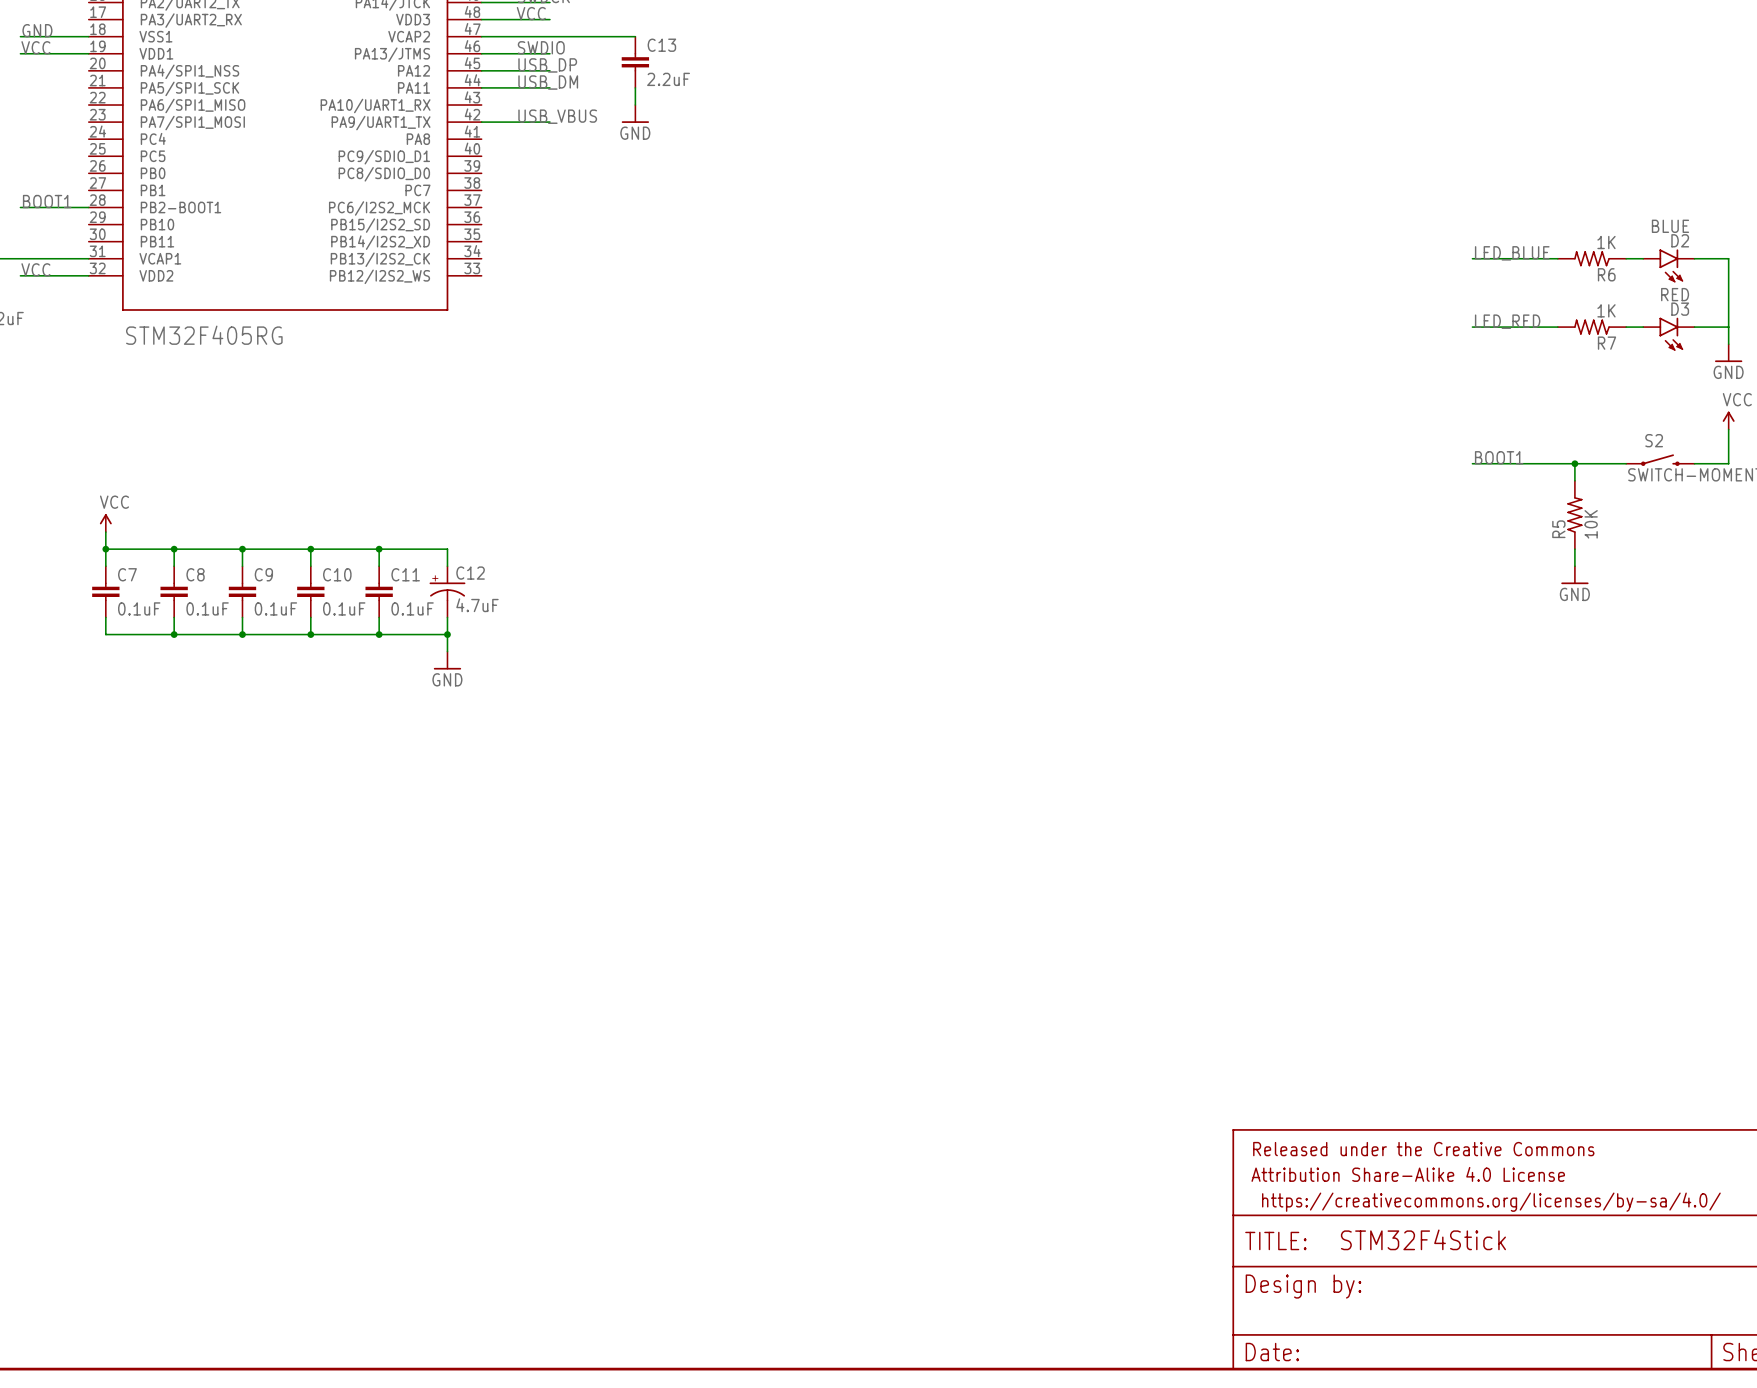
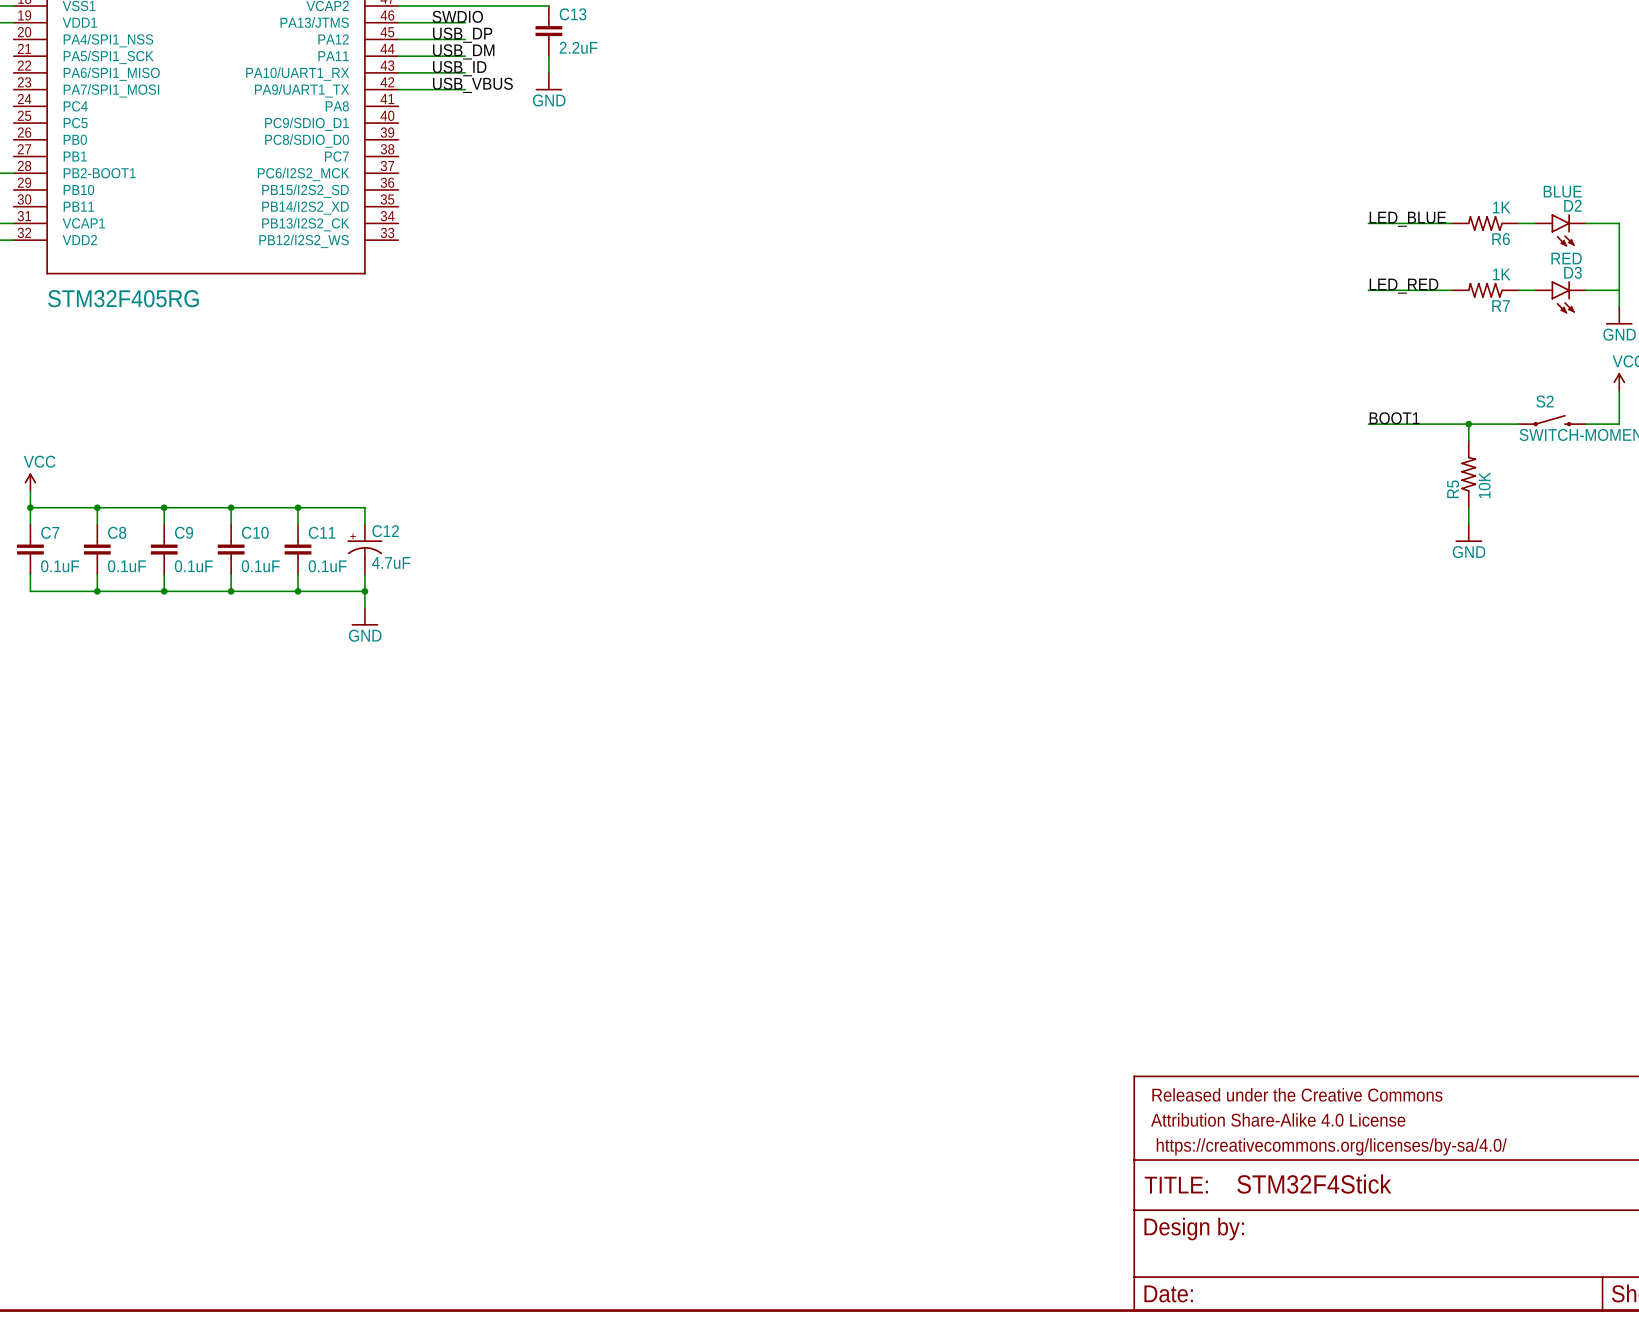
label: none -> USB_ID (459, 68)
wire: none -> (398, 72) (465, 72)

